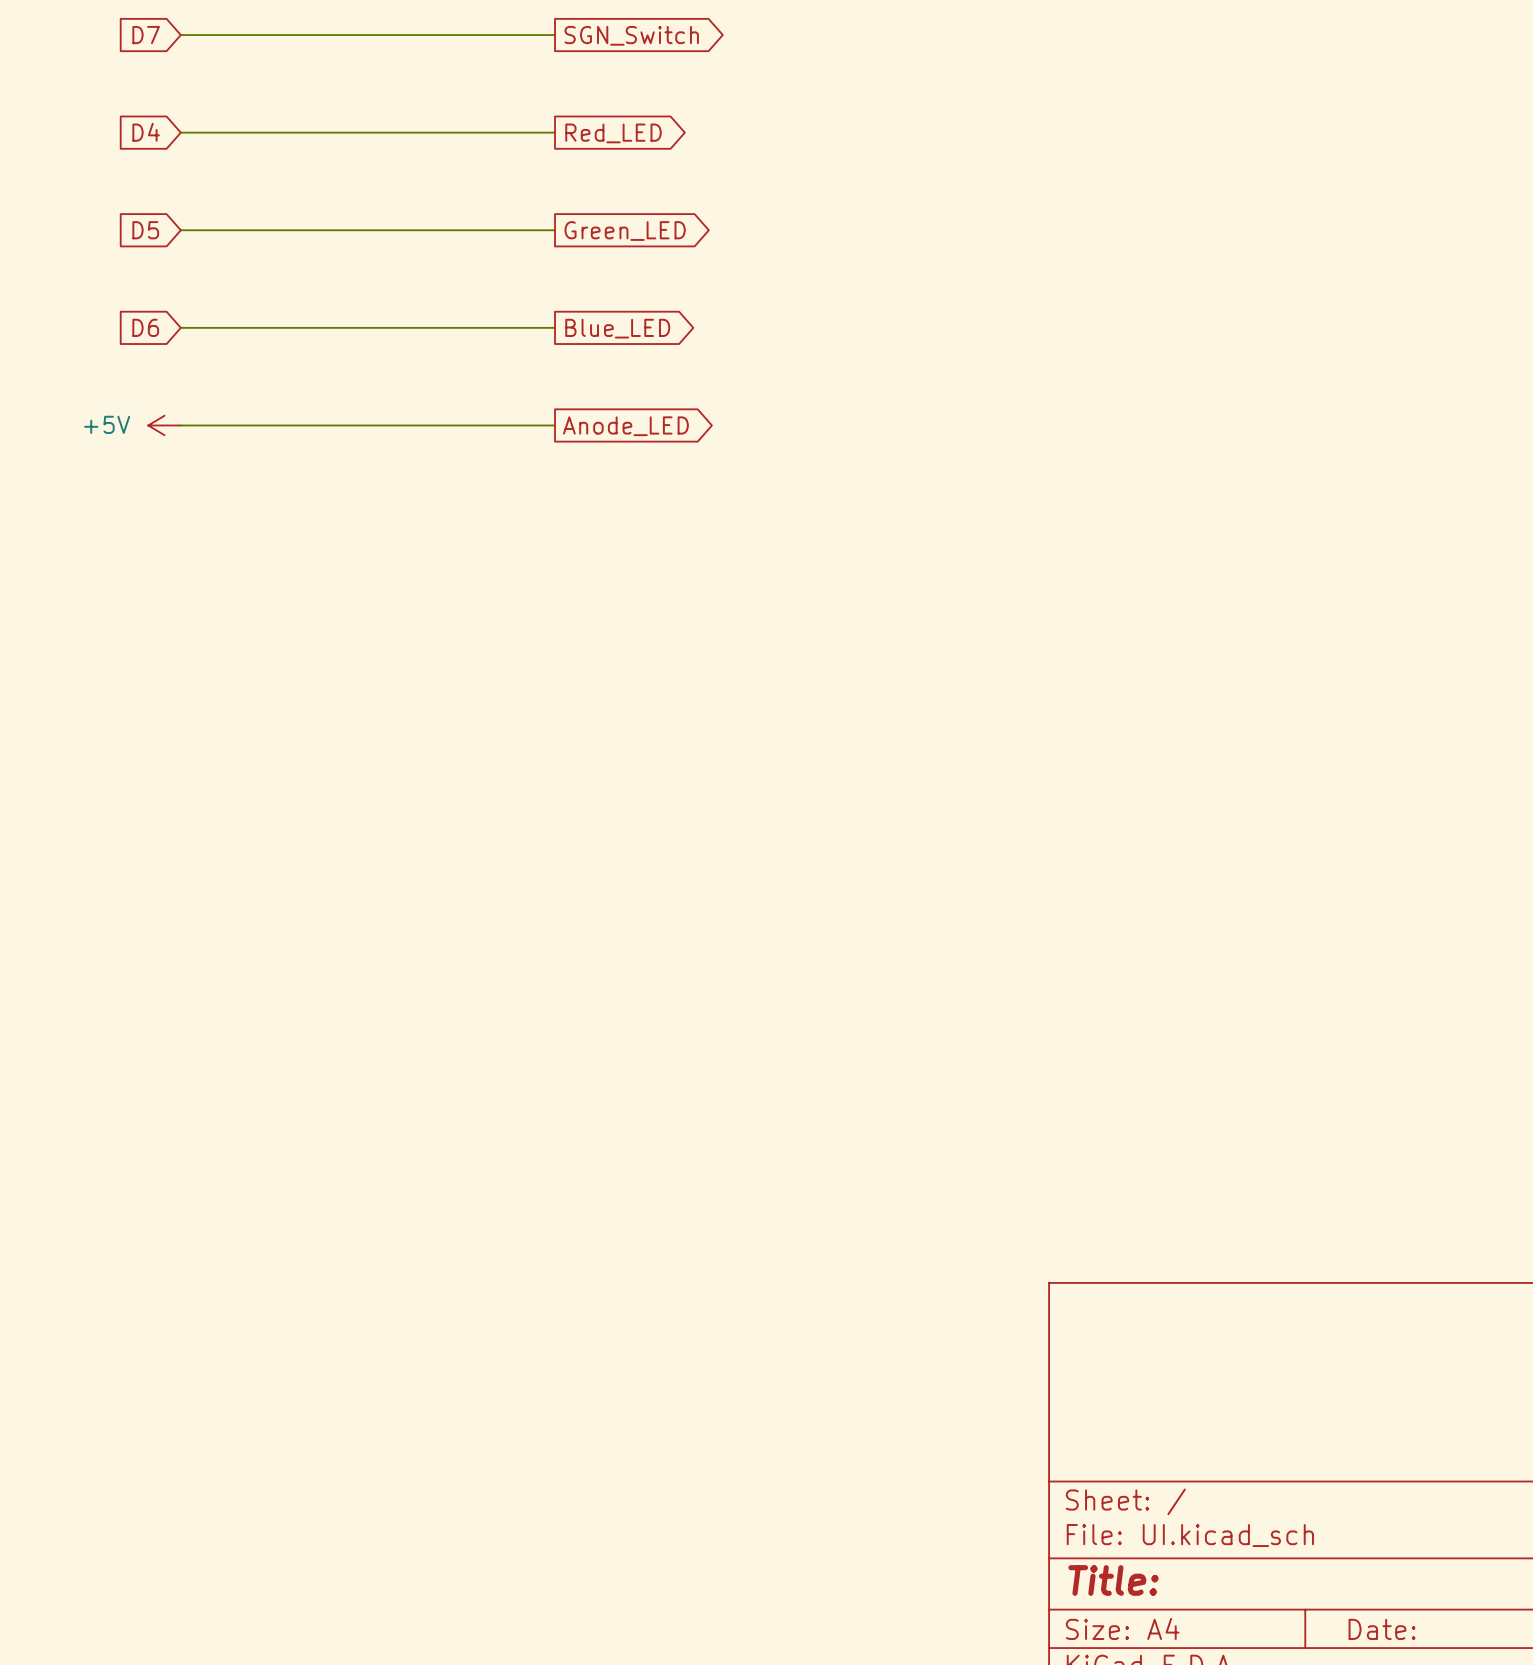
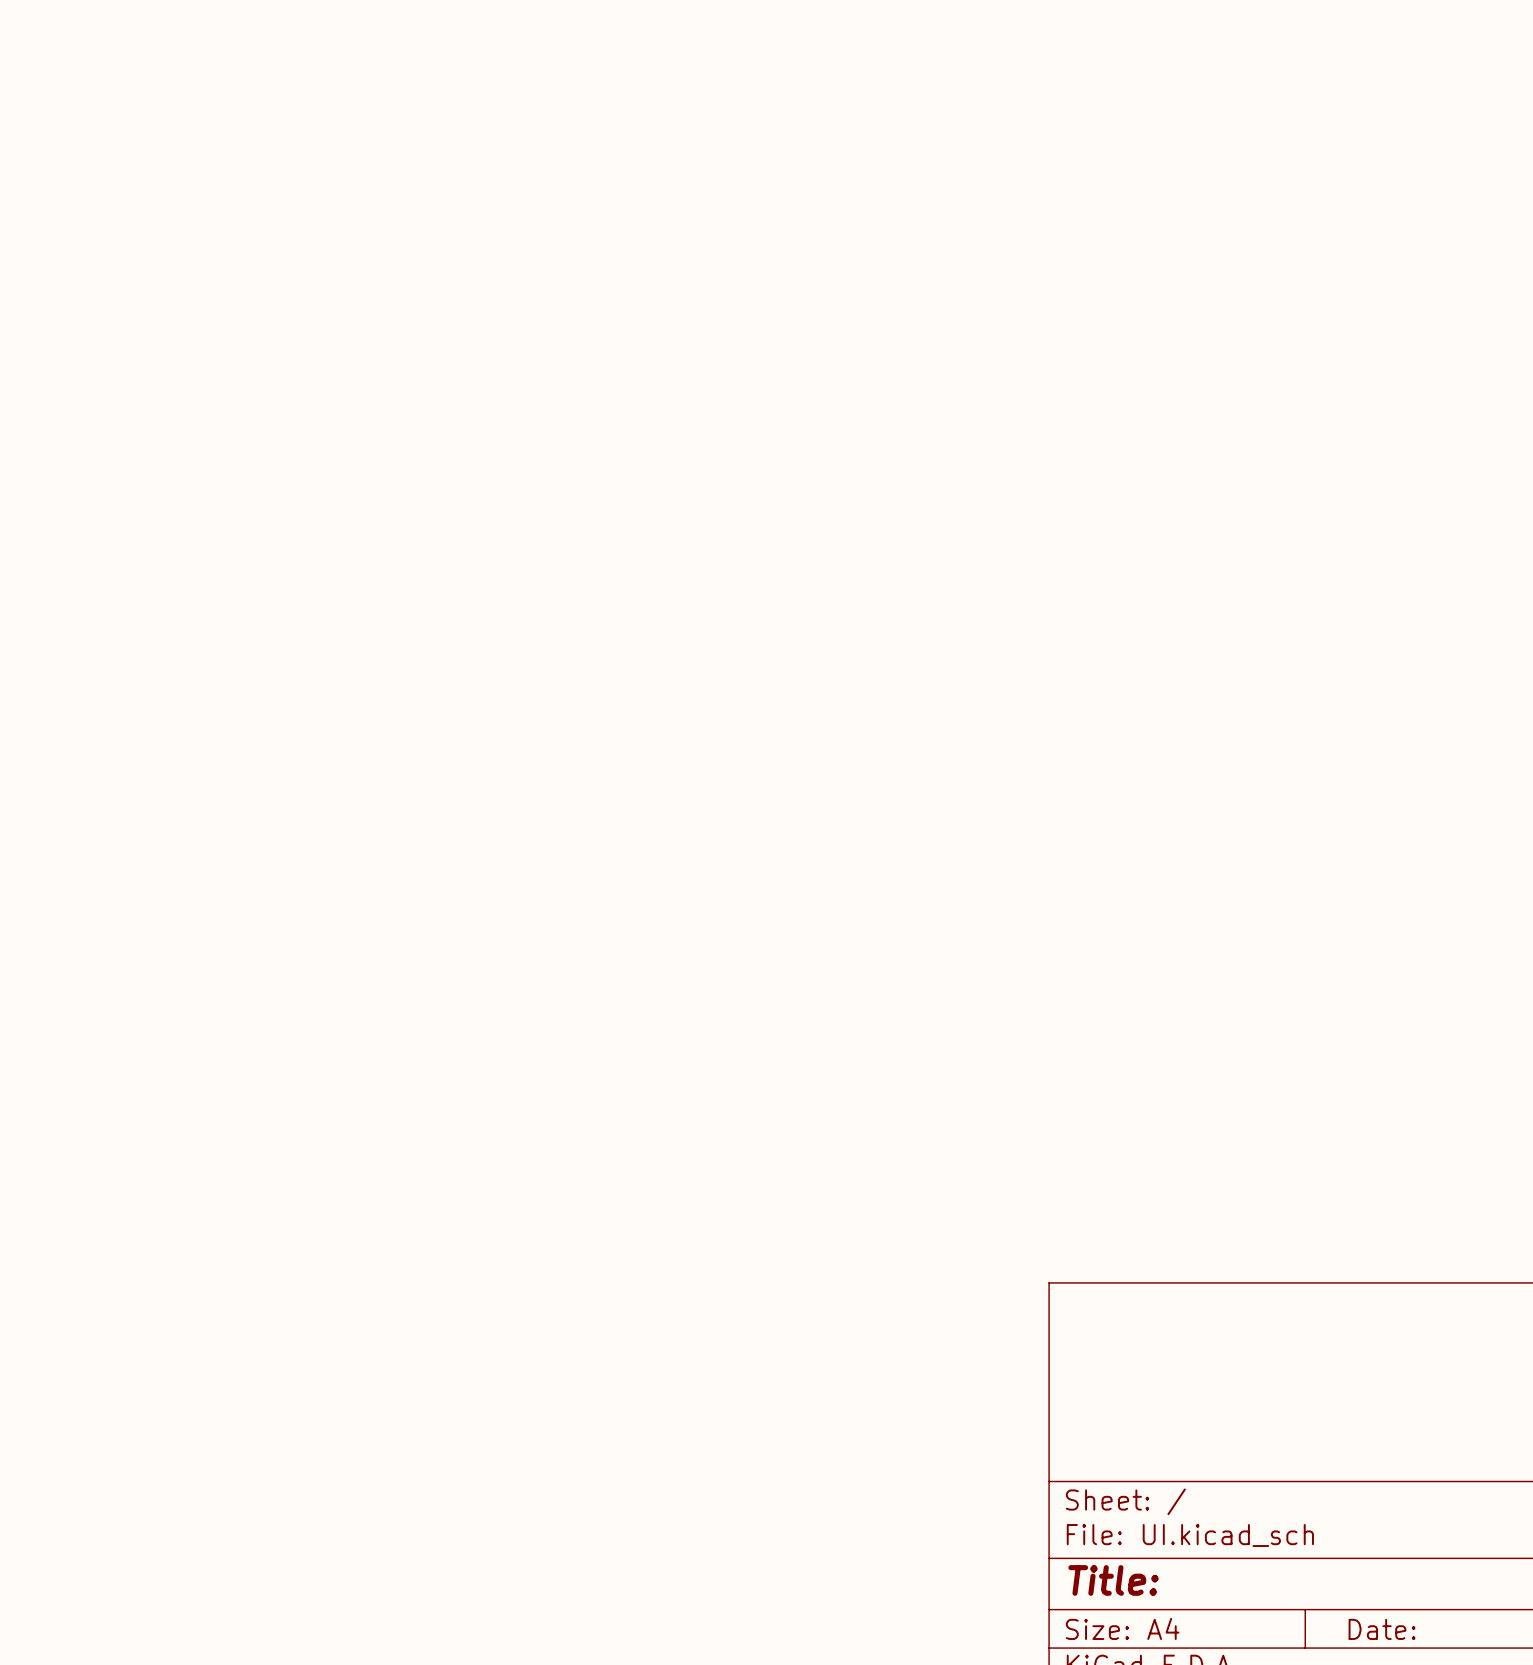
global label: D7 (146, 35) -> none
wire: (180, 35) (555, 35) -> none
global label: SGN_Switch (631, 35) -> none
global label: D4 (146, 132) -> none
wire: (180, 132) (555, 132) -> none
global label: Red_LED (613, 133) -> none
global label: D5 (145, 230) -> none
wire: (180, 230) (555, 230) -> none
global label: Green_LED (625, 231) -> none
global label: D6 (145, 327) -> none
wire: (180, 327) (555, 327) -> none
global label: Blue_LED (617, 328) -> none
power symbol: +5V (164, 425) -> none
wire: (180, 425) (555, 425) -> none
global label: Anode_LED (625, 426) -> none

